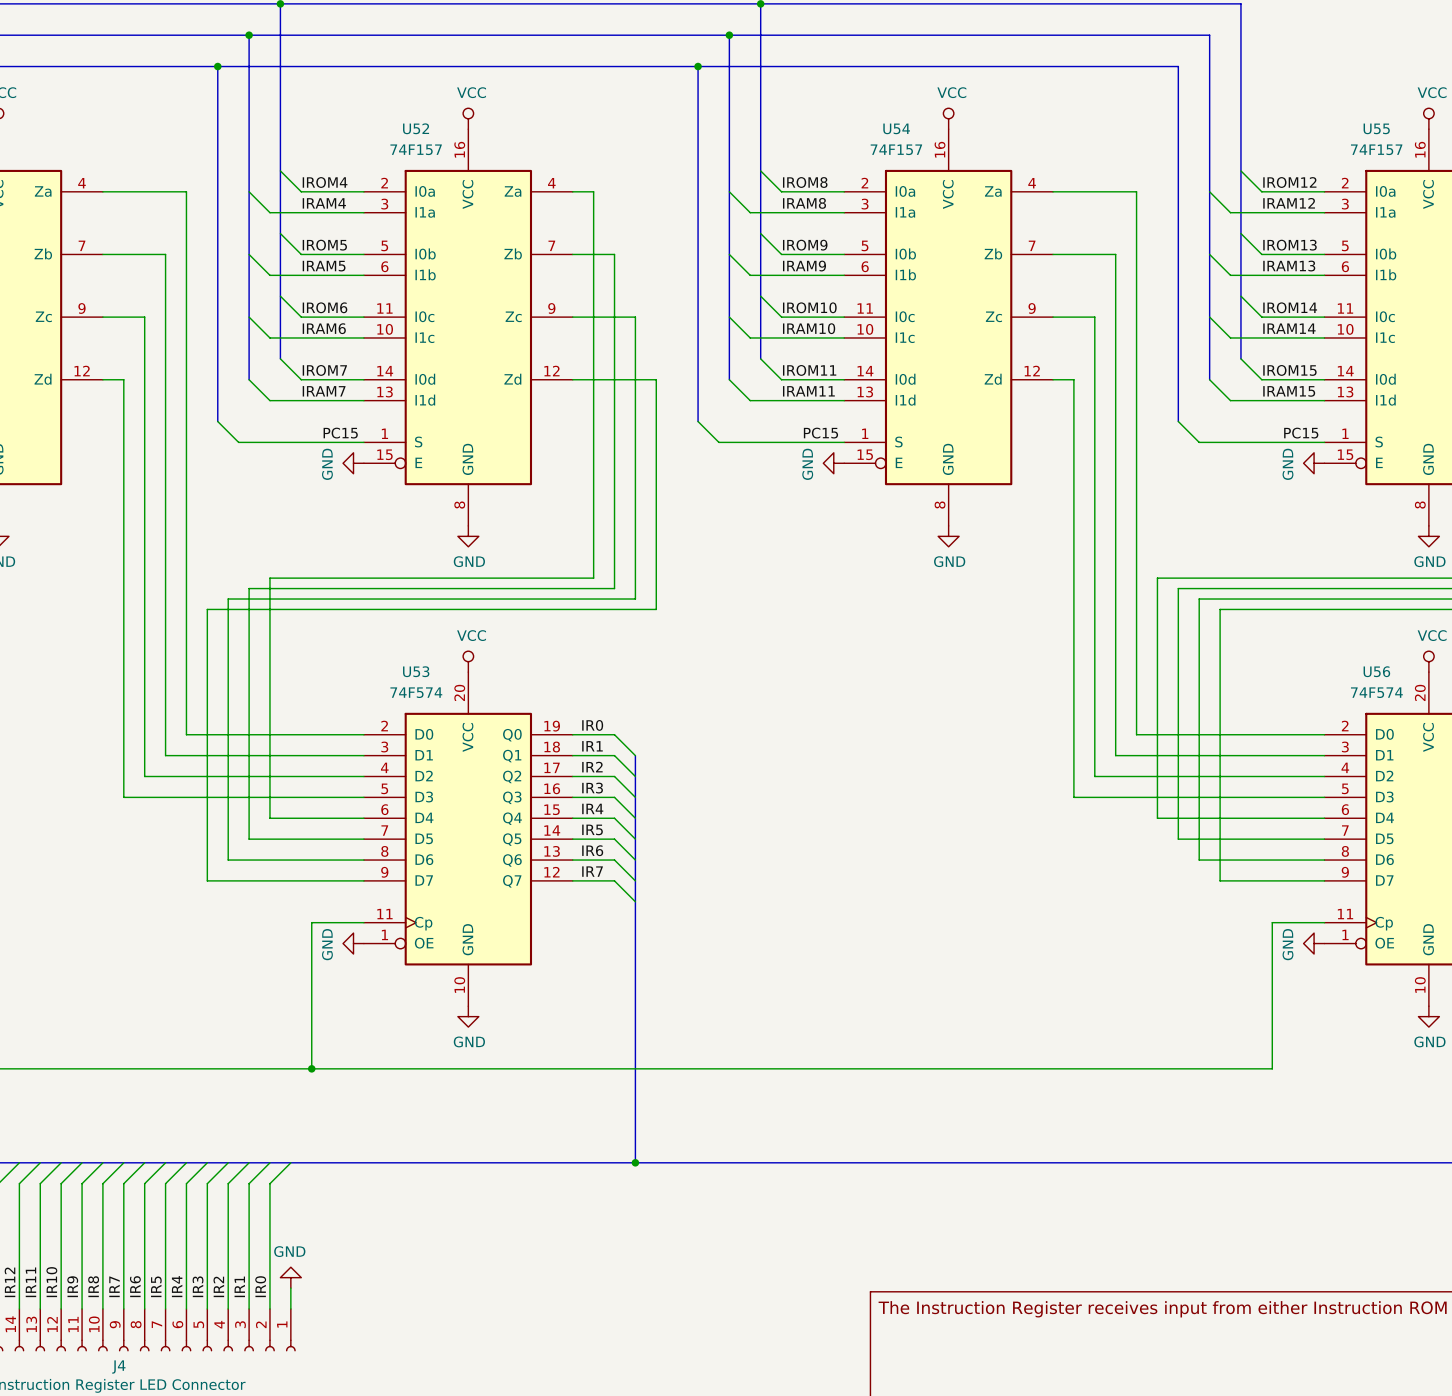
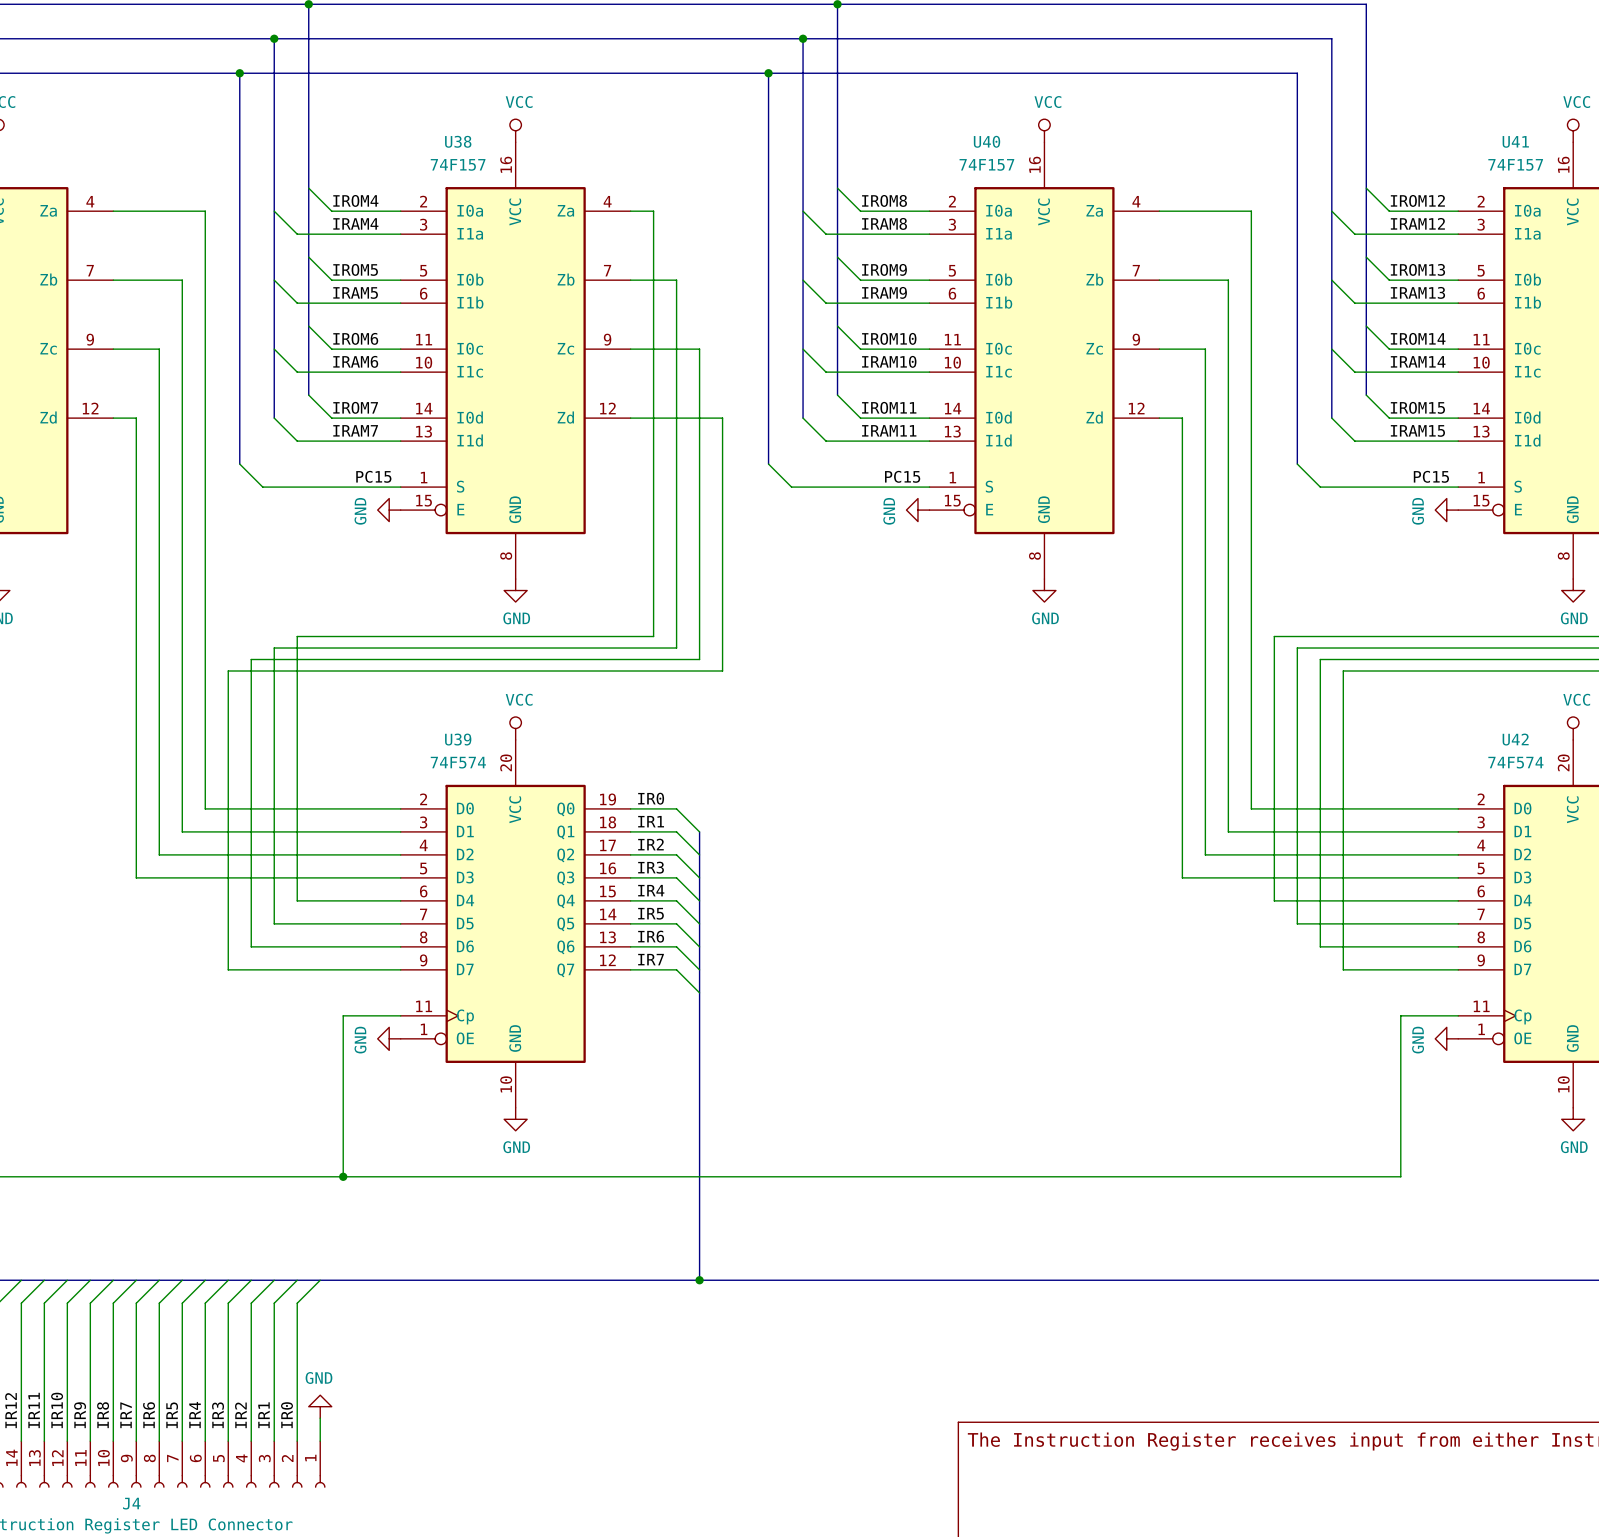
U52 name: U52 (416, 128) -> U38 (458, 141)
U54 name: U54 (896, 128) -> U40 (987, 141)
U55 name: U55 (1376, 128) -> U41 (1515, 141)
U53 name: U53 (416, 671) -> U39 (458, 739)
U56 name: U56 (1376, 671) -> U42 (1515, 739)

